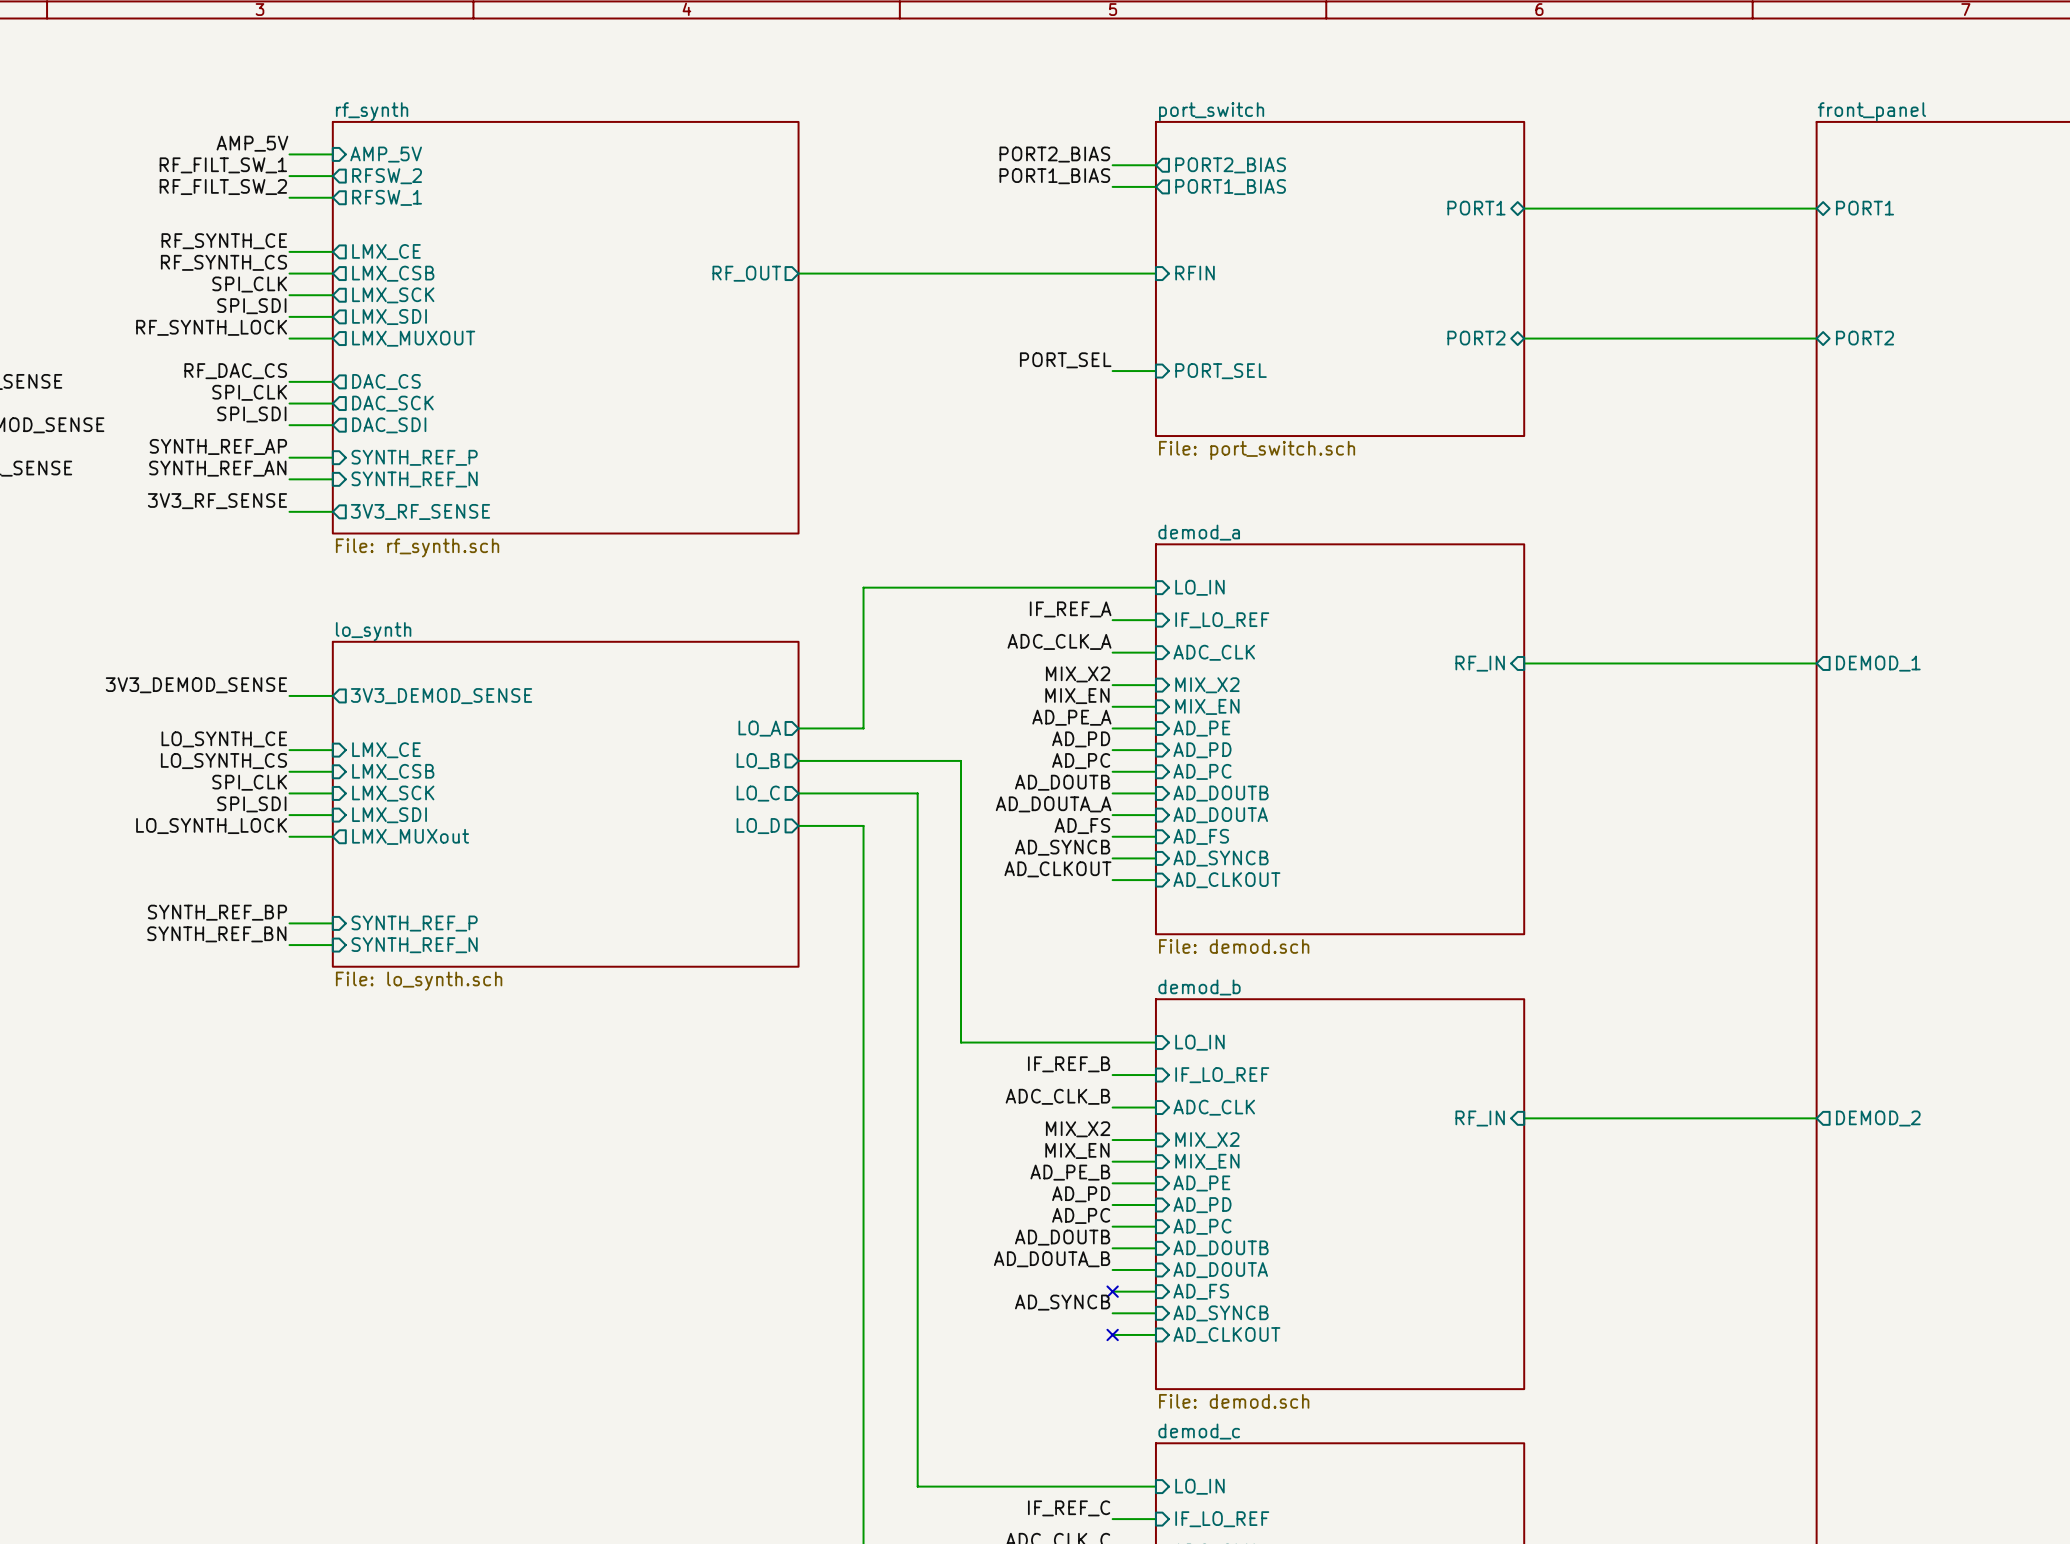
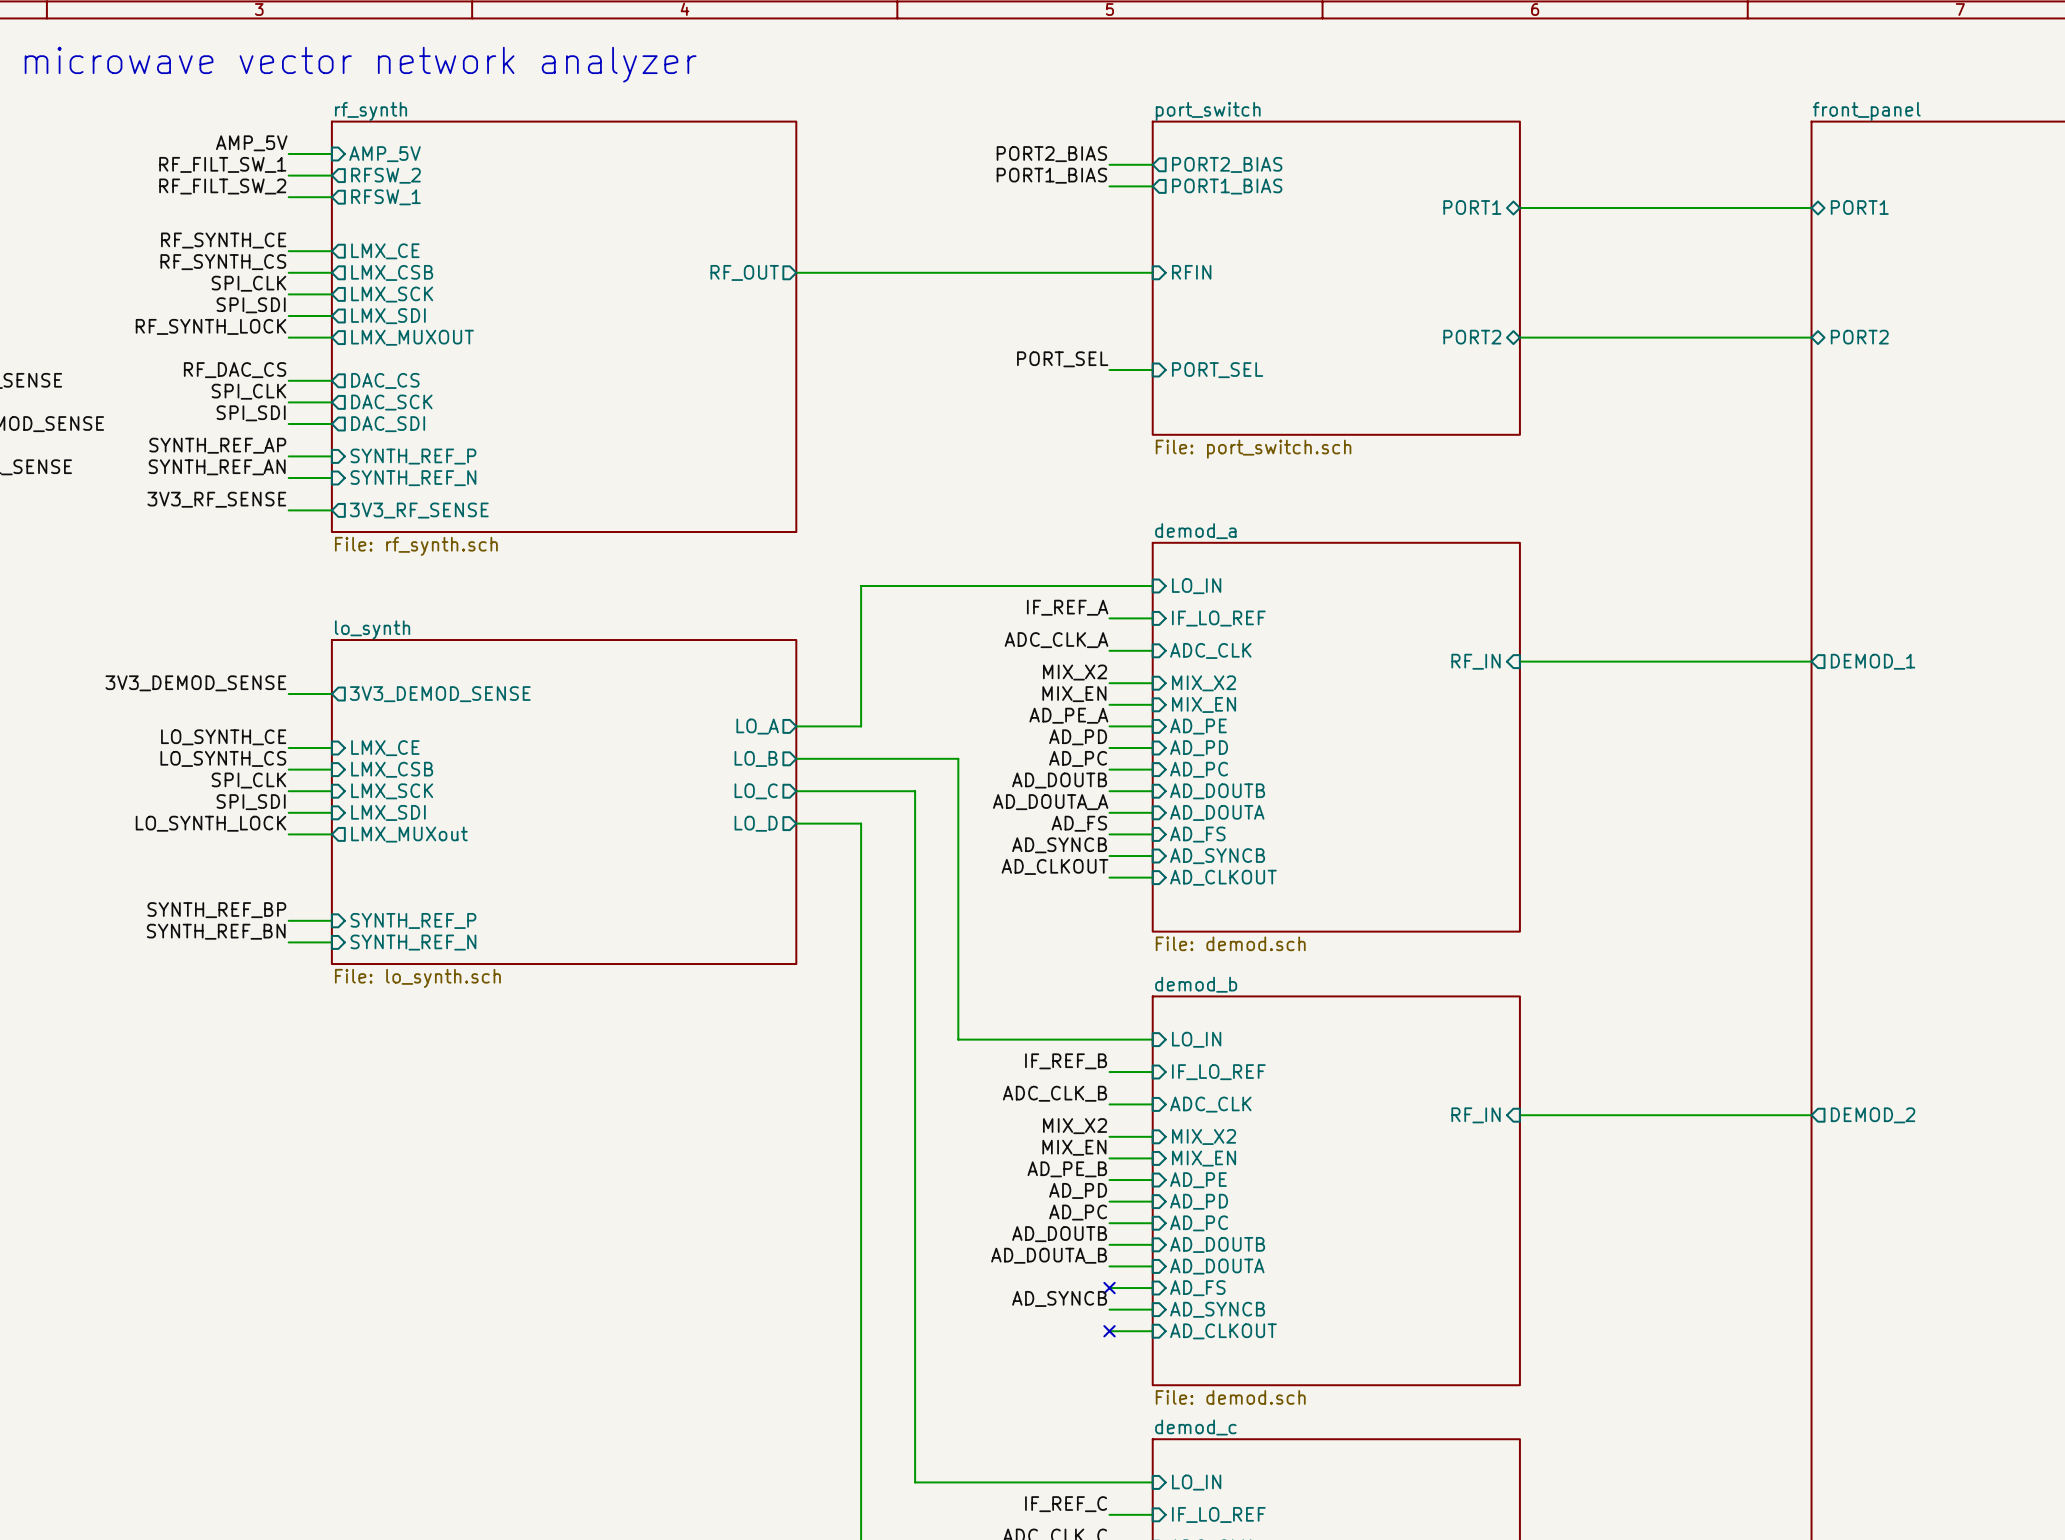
text: none -> microwave vector network analyzer (360, 64)

